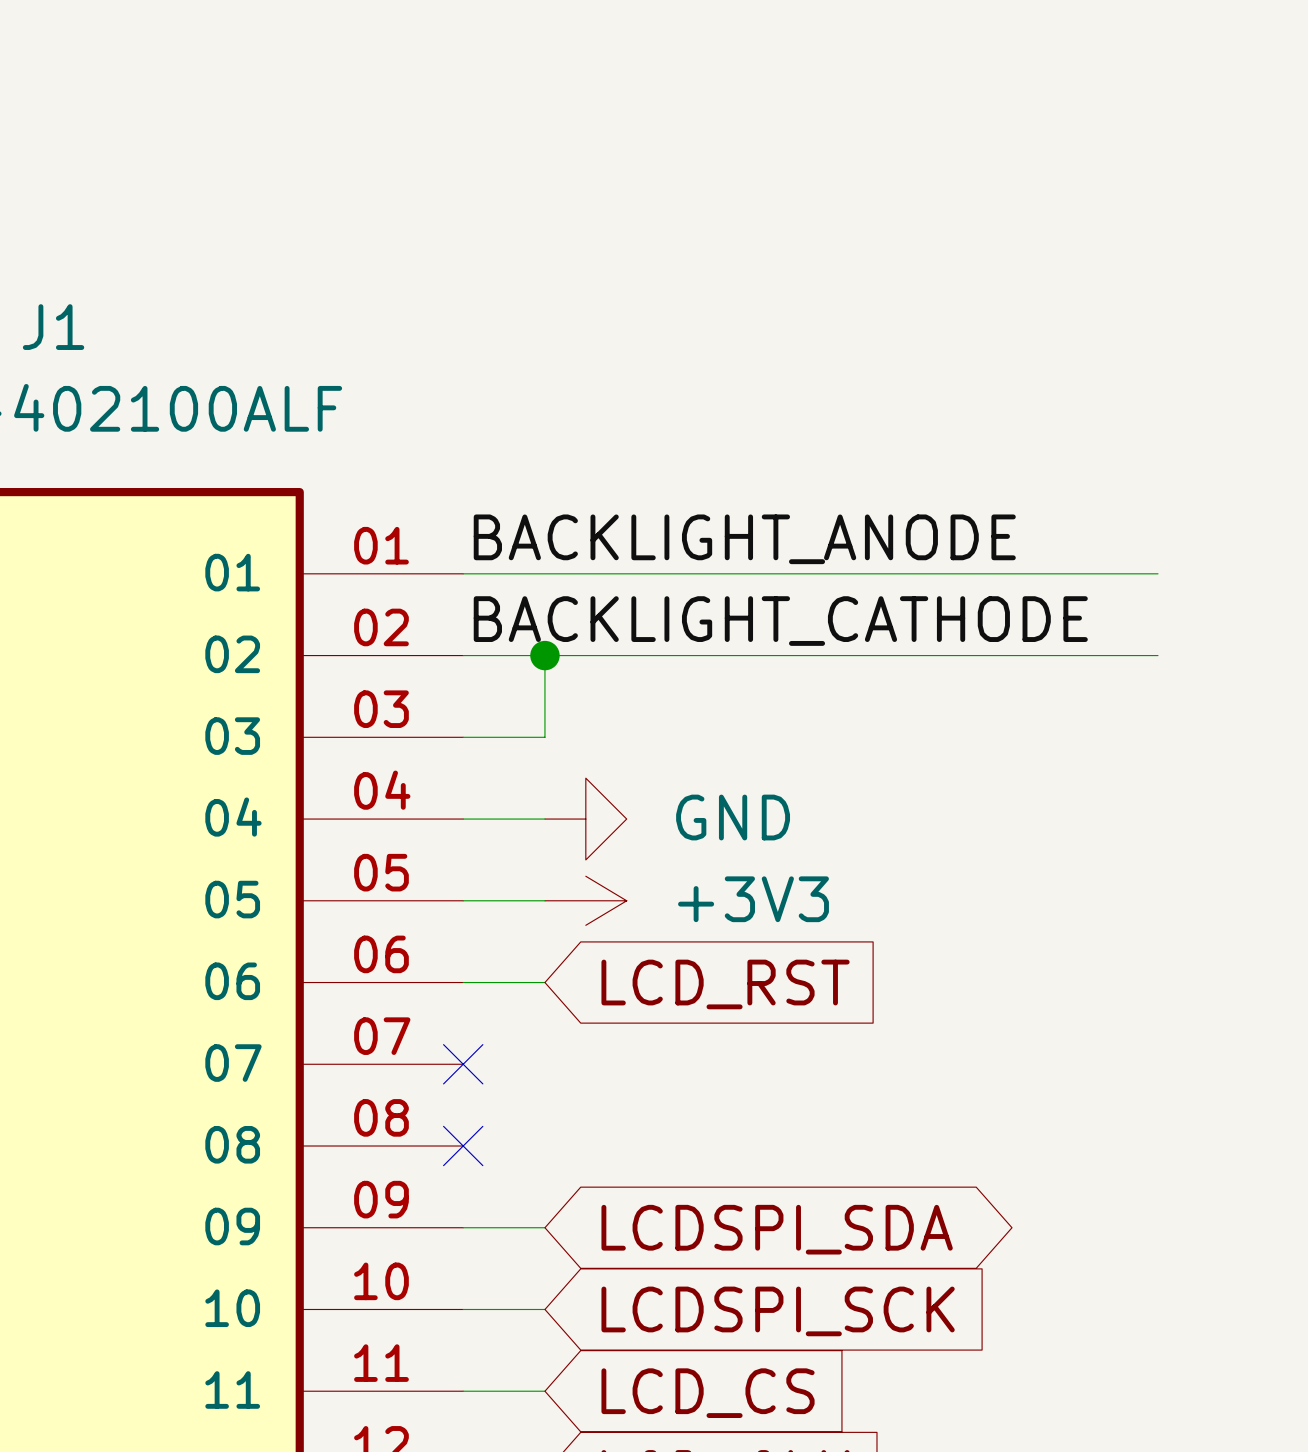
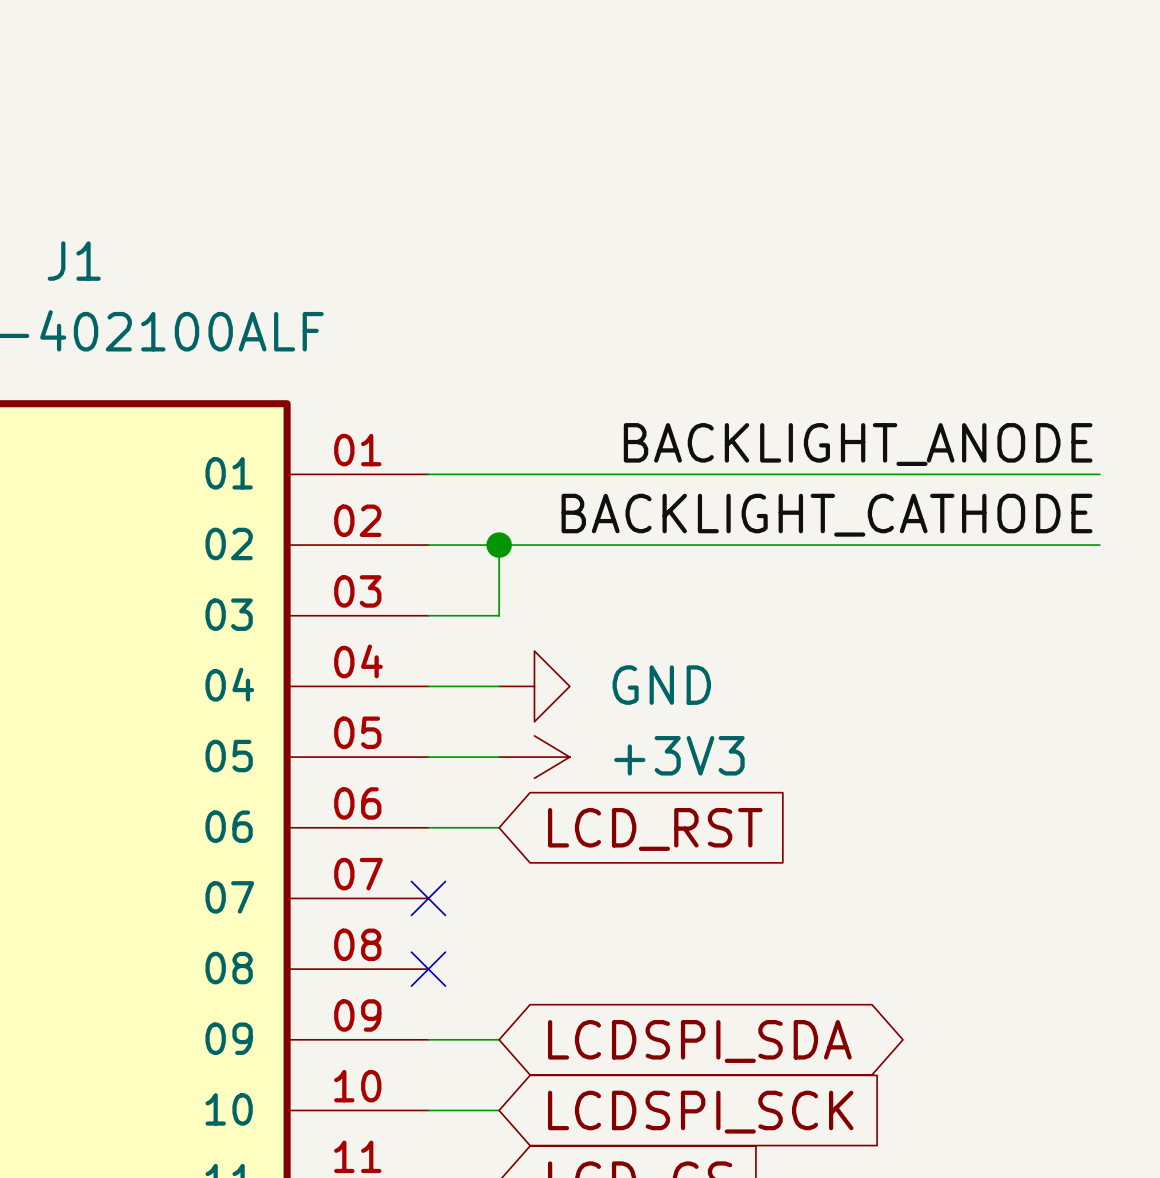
label position: BACKLIGHT_ANODE (744, 539) -> BACKLIGHT_ANODE (858, 444)
wire: none -> (1029, 474) (1099, 474)
label position: BACKLIGHT_CATHODE (780, 621) -> BACKLIGHT_CATHODE (827, 515)
wire: none -> (1029, 545) (1099, 545)

